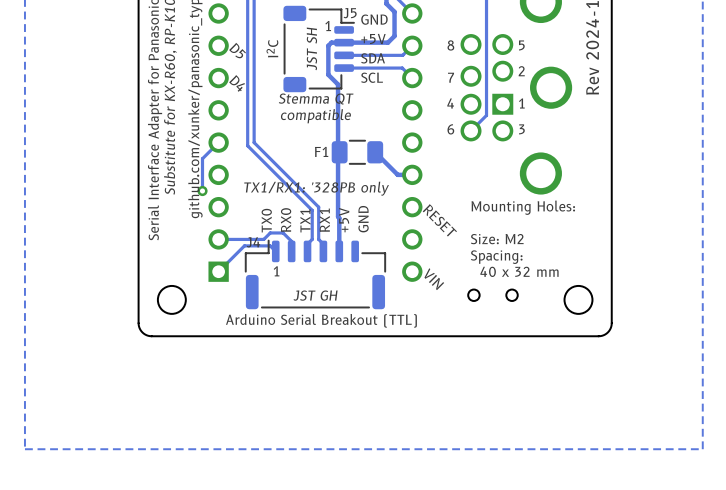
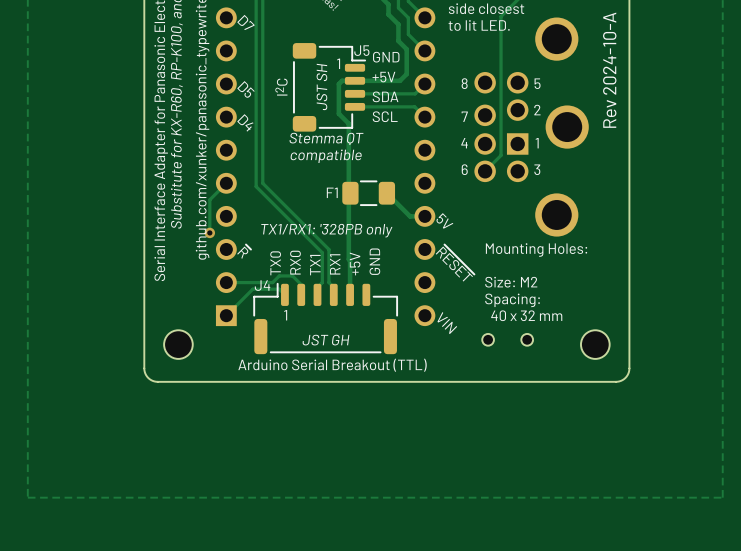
text: none -> 5V (444, 220)
text: none -> ~{R} (244, 251)
text: RESET (439, 220) -> ~{RESET} (455, 263)

